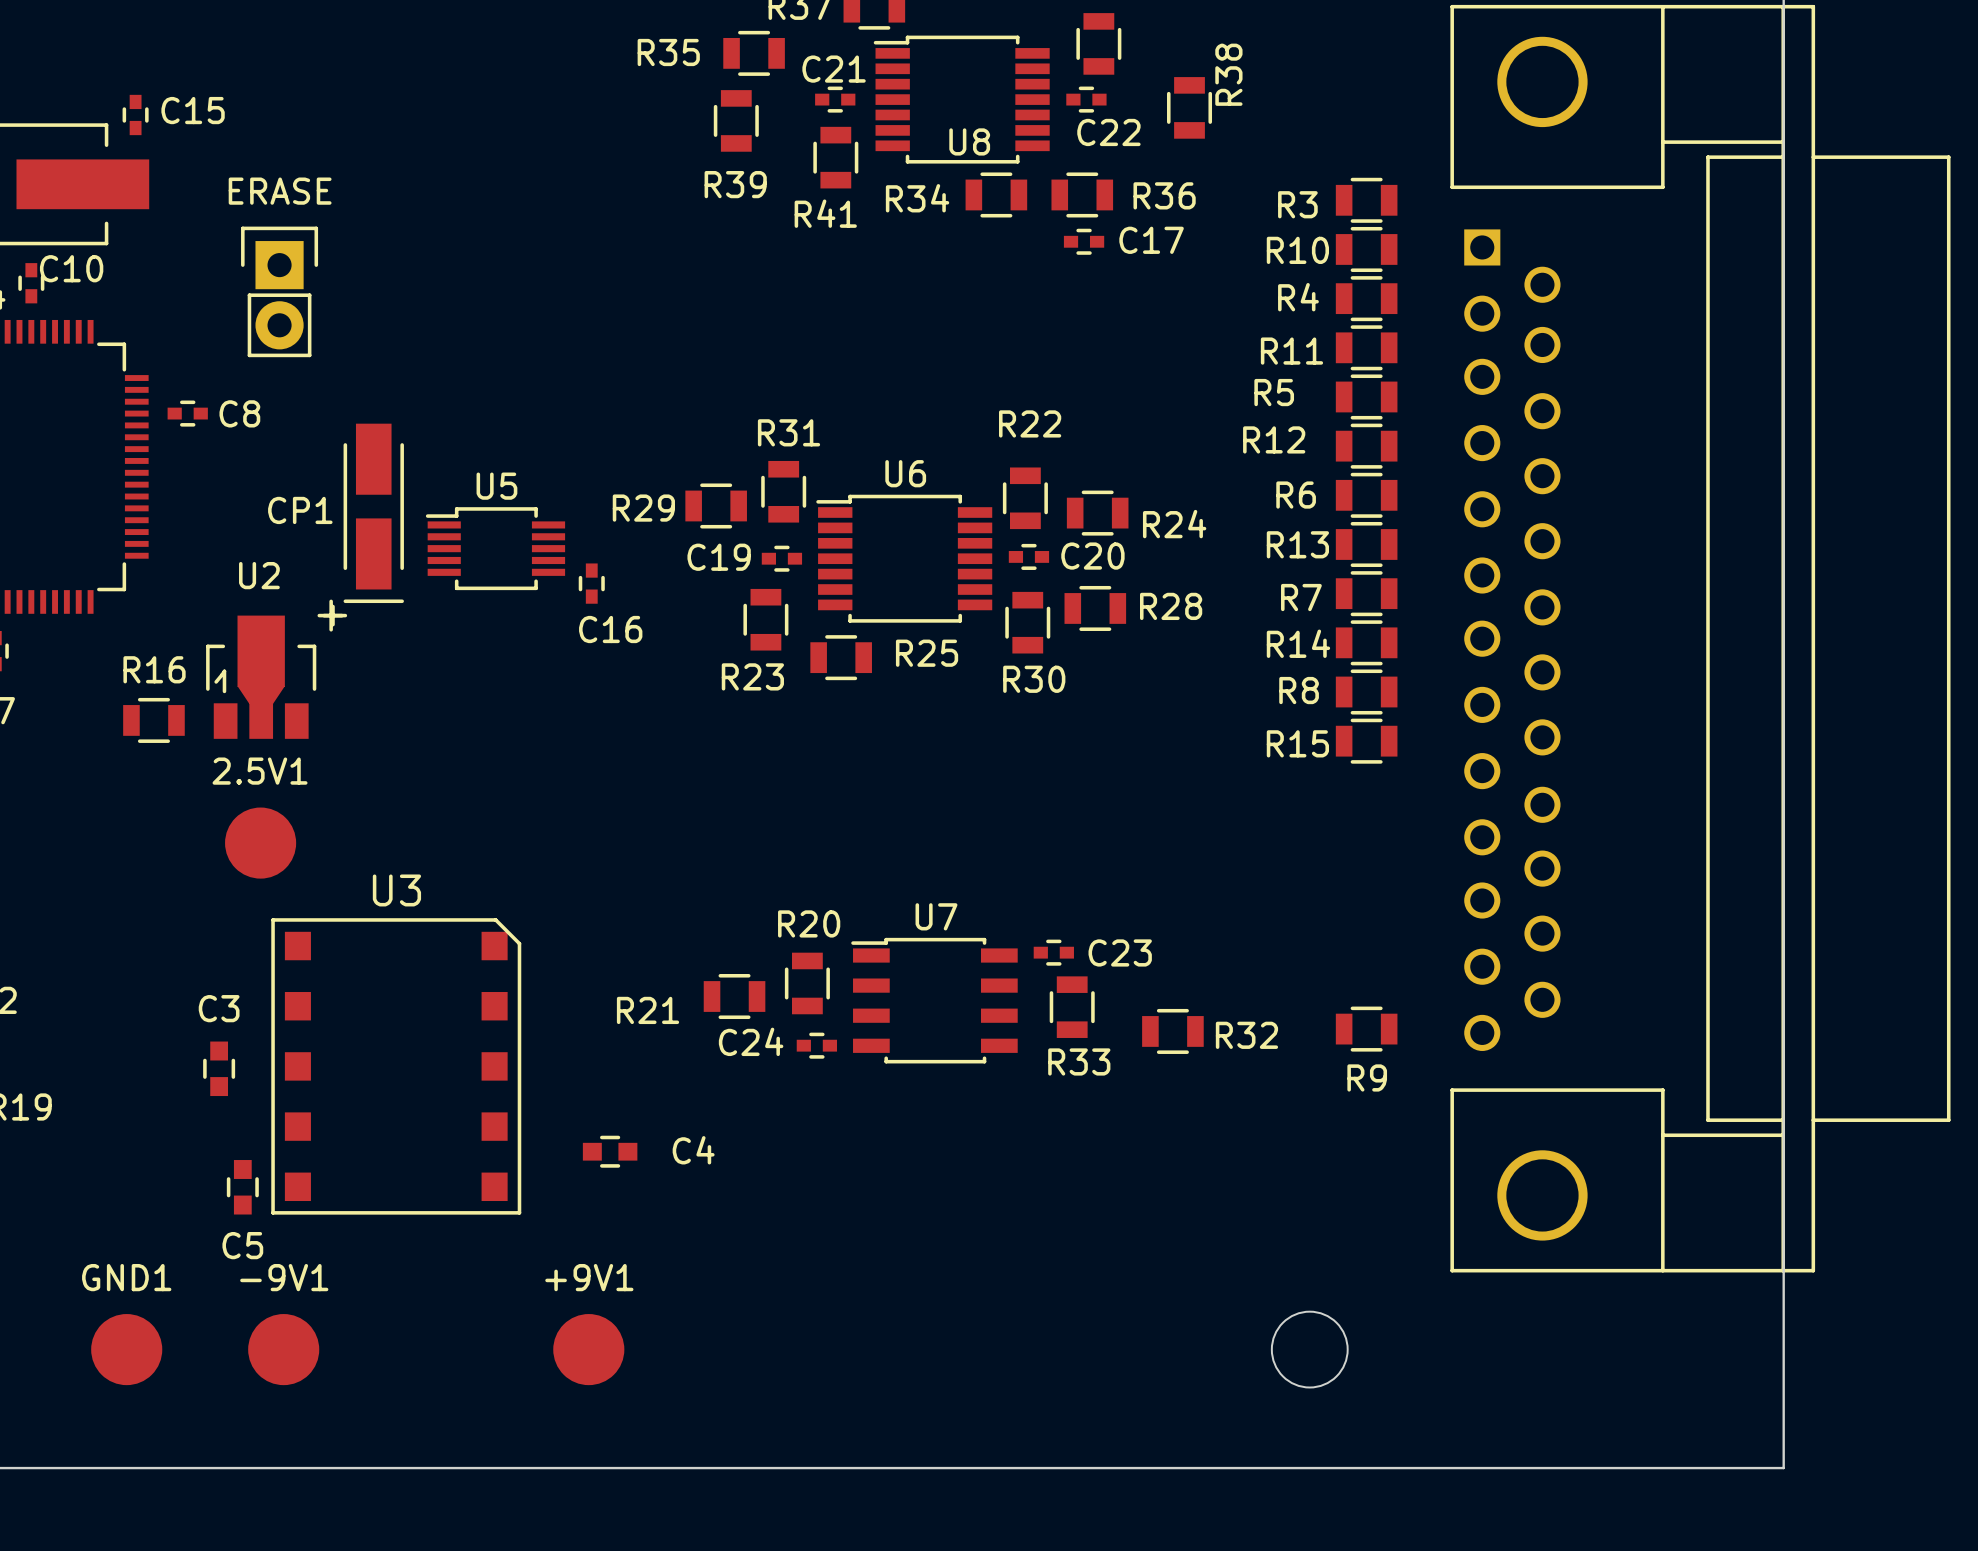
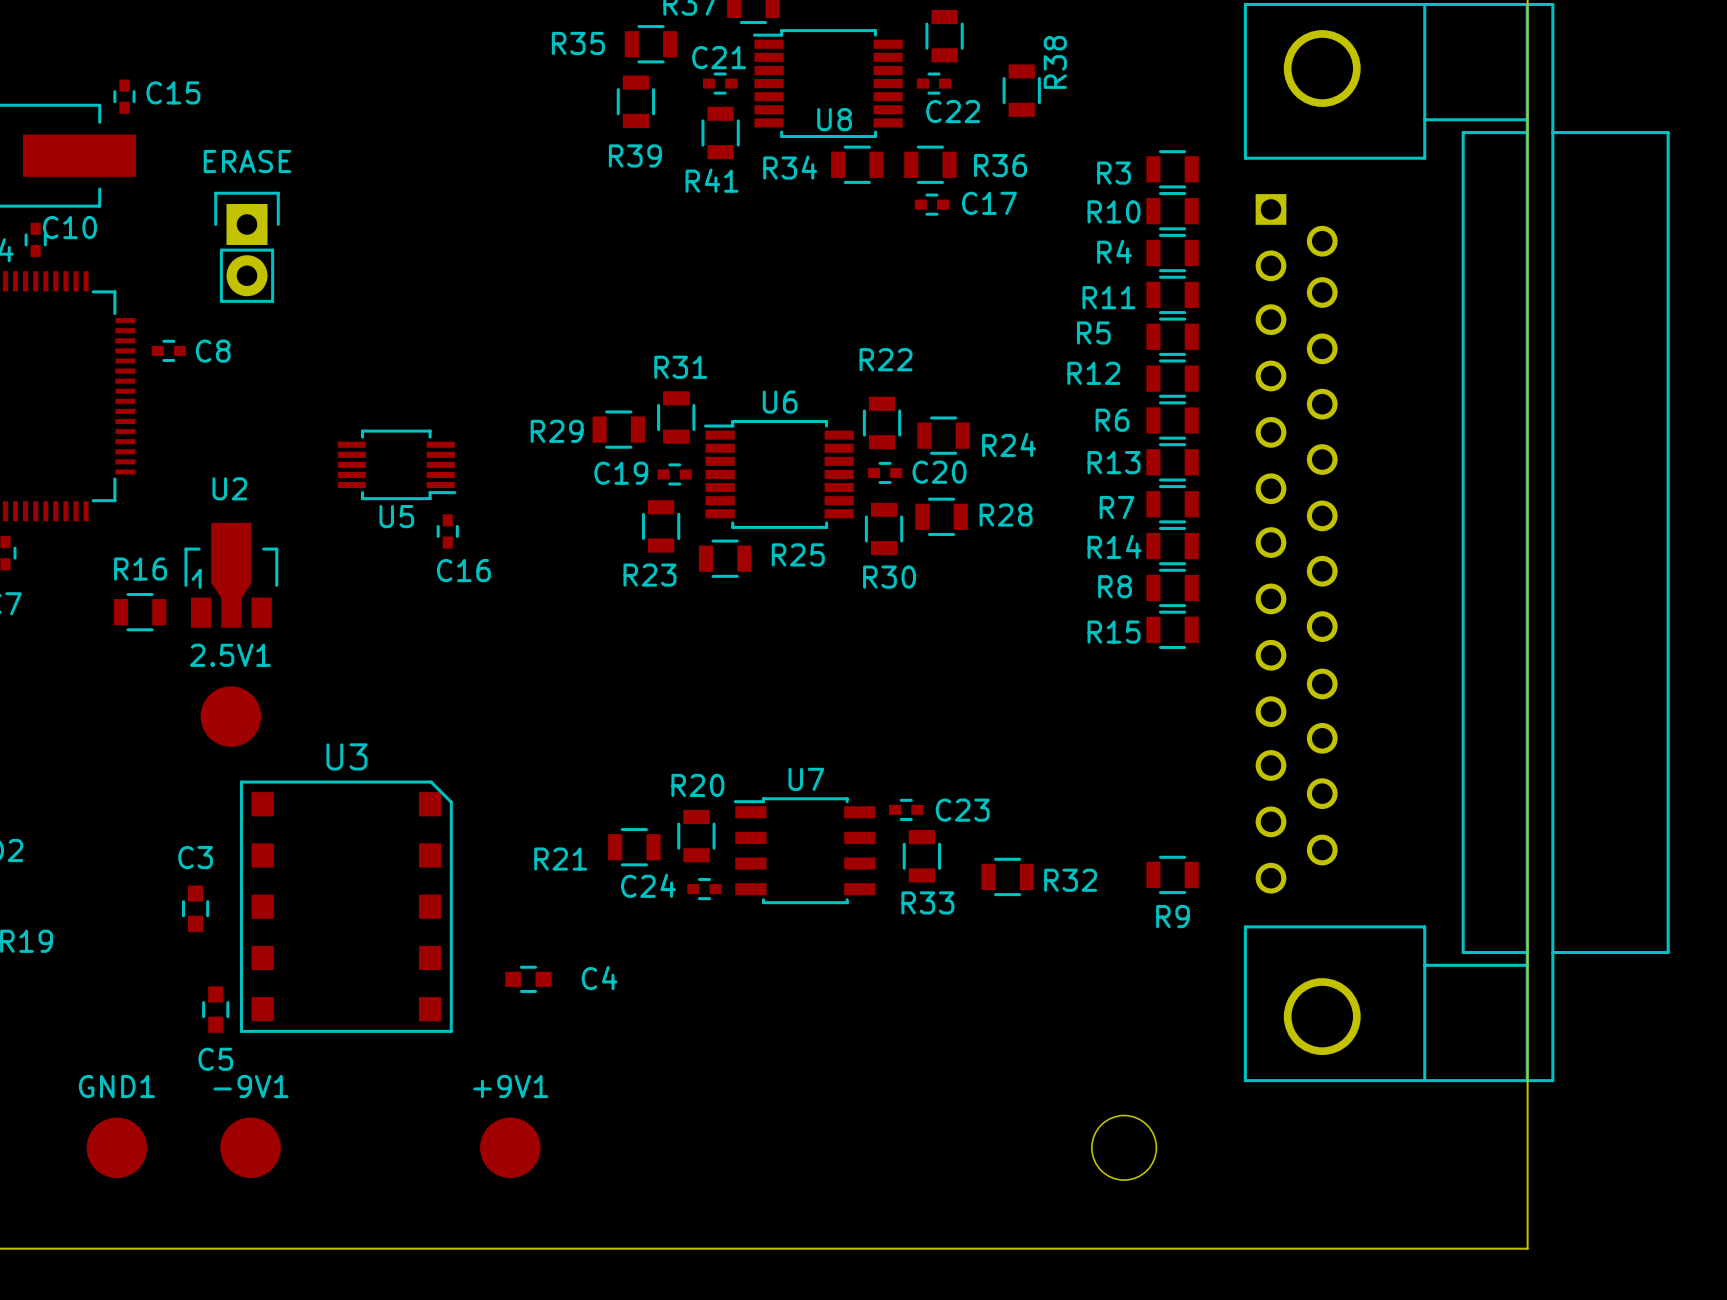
CP1: (360, 527) -> none
U5 rotation: 0° (495, 548) -> 180° (397, 464)
C16 position: (591, 583) -> (447, 531)

